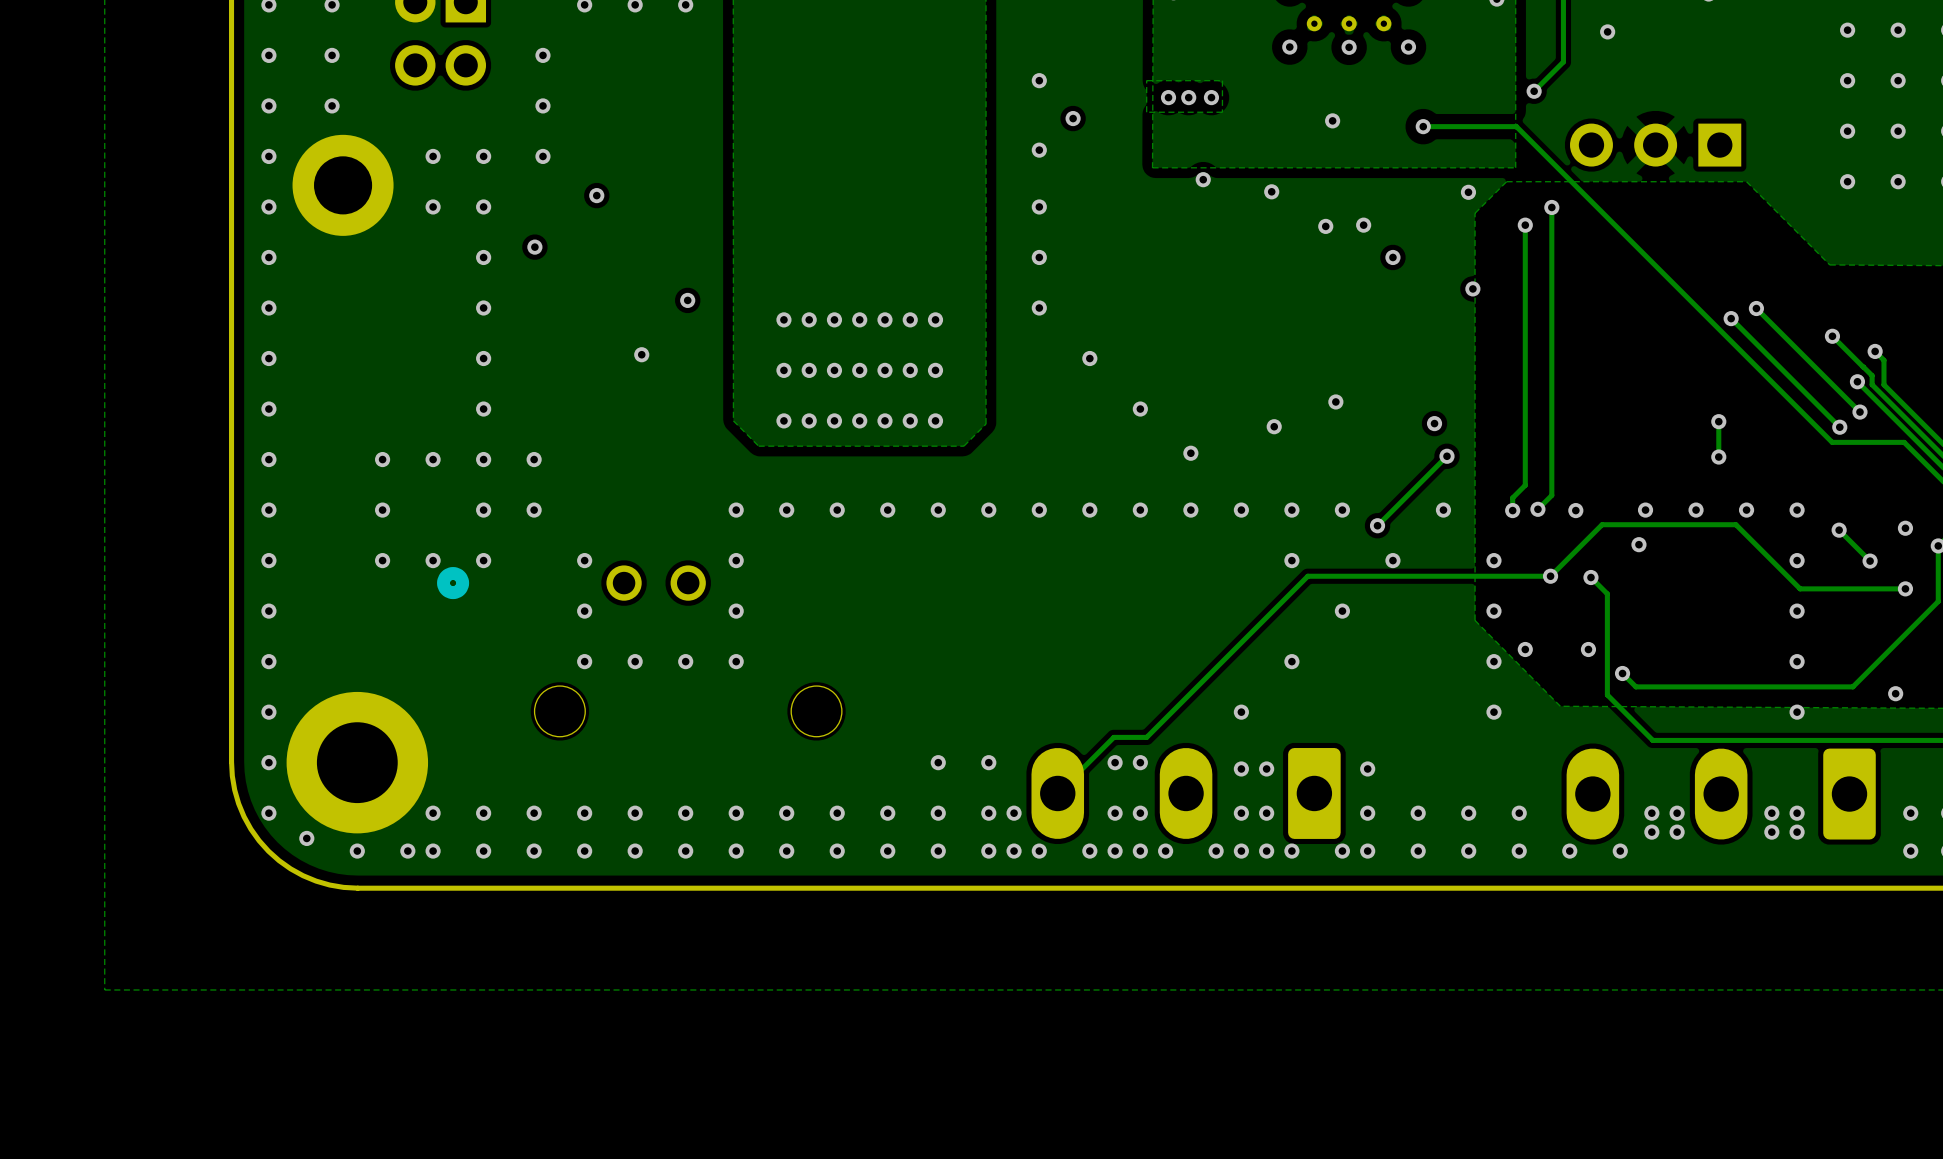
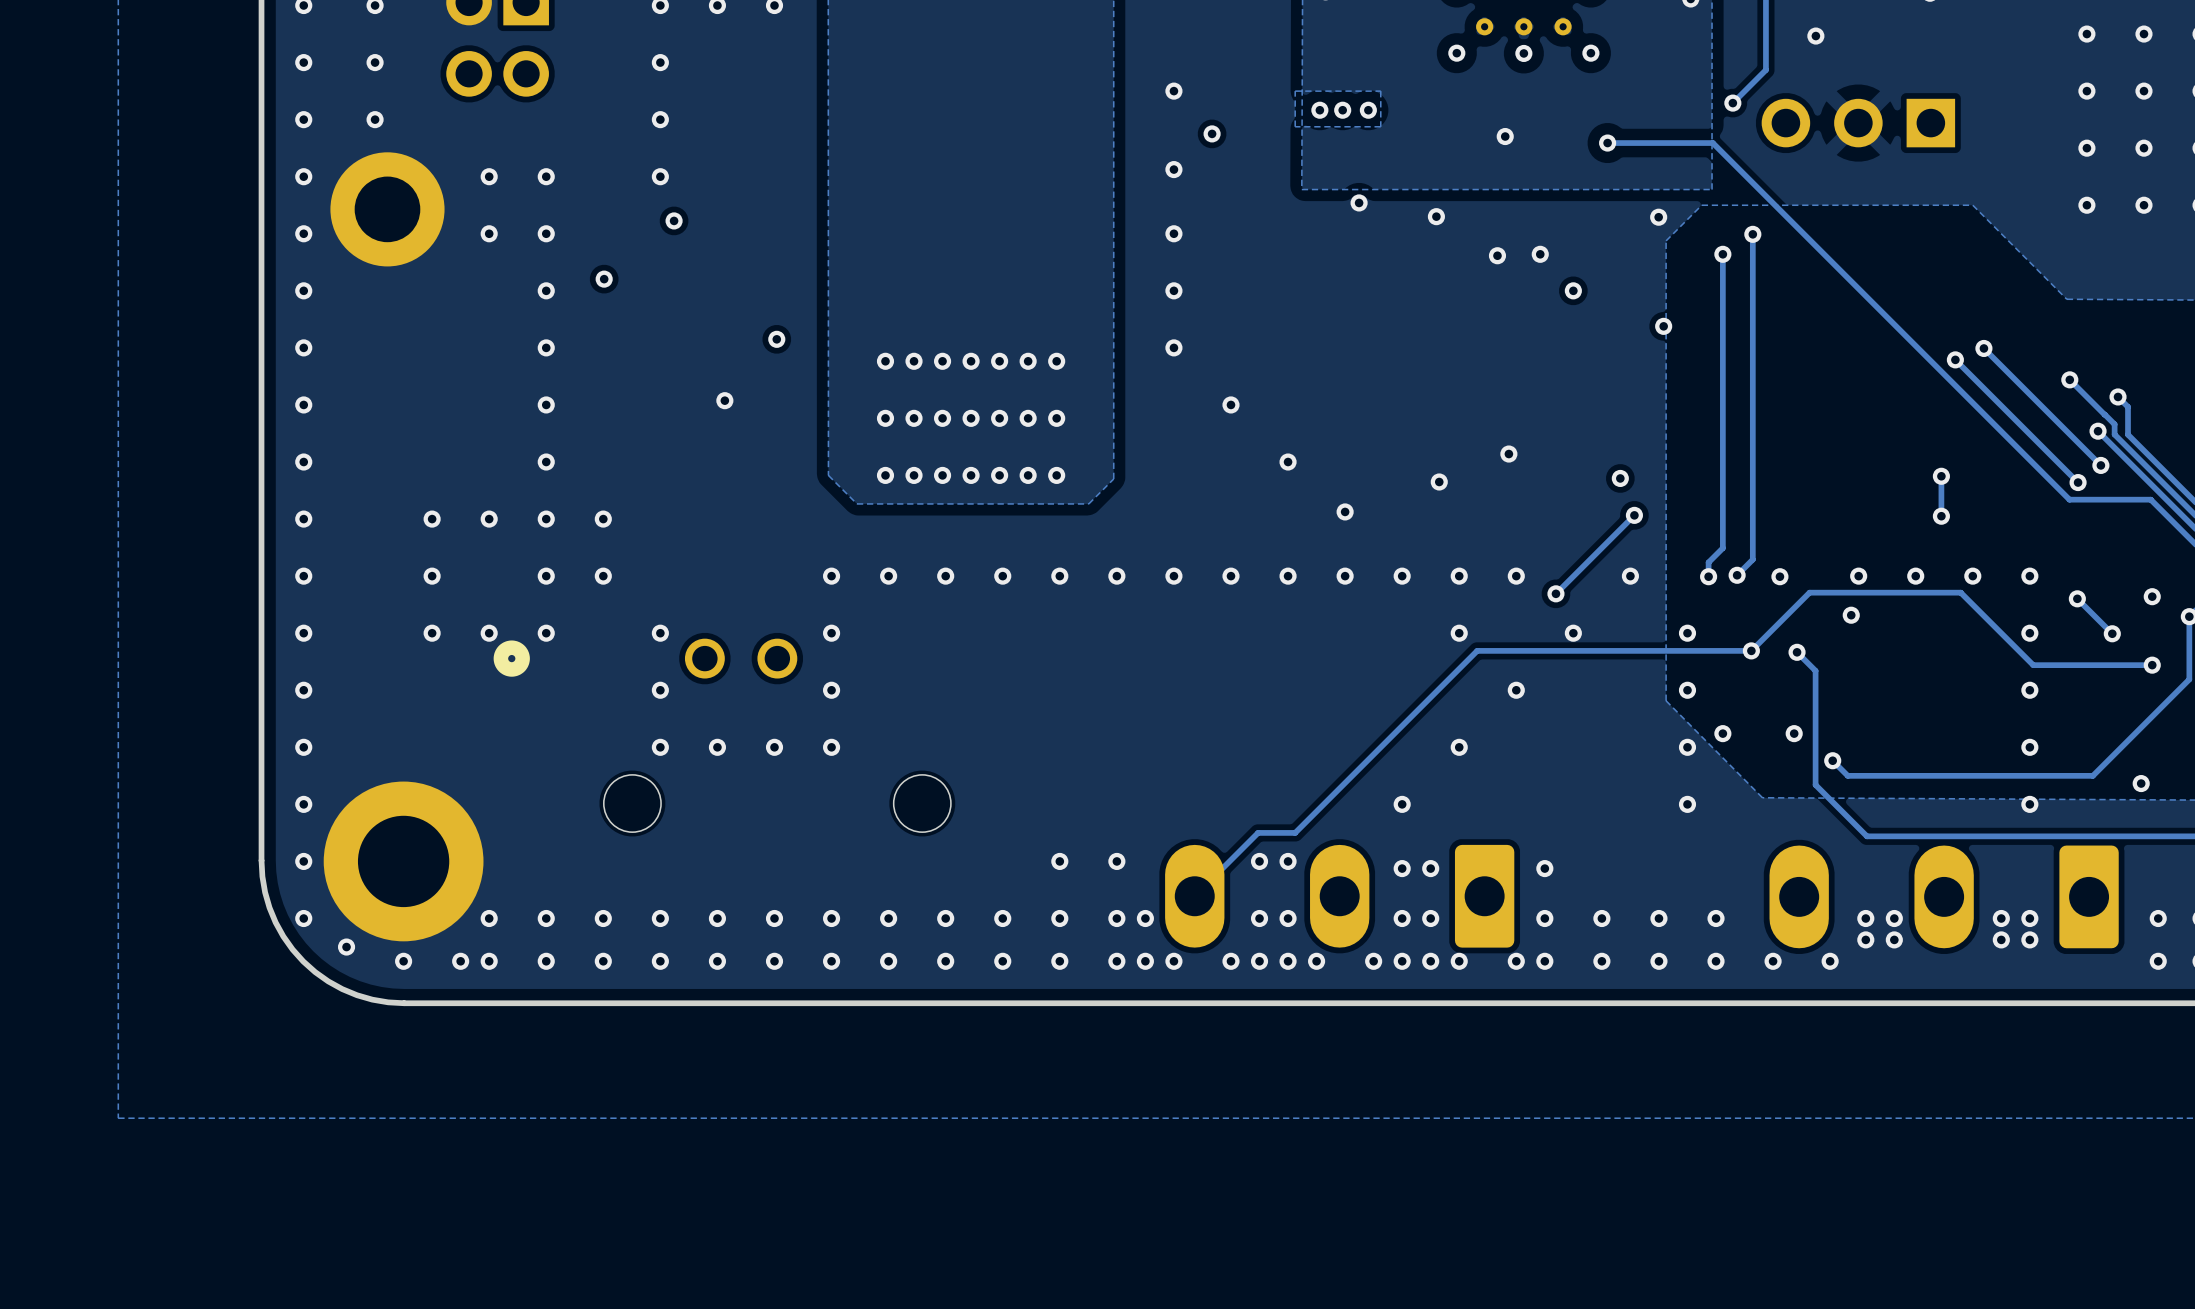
via: (542, 55) -> none
via: none -> (660, 62)
via: (542, 105) -> none
via: none -> (660, 119)
part position: (1655, 145) -> (1858, 123)
via: (542, 156) -> none
via: none -> (660, 176)

